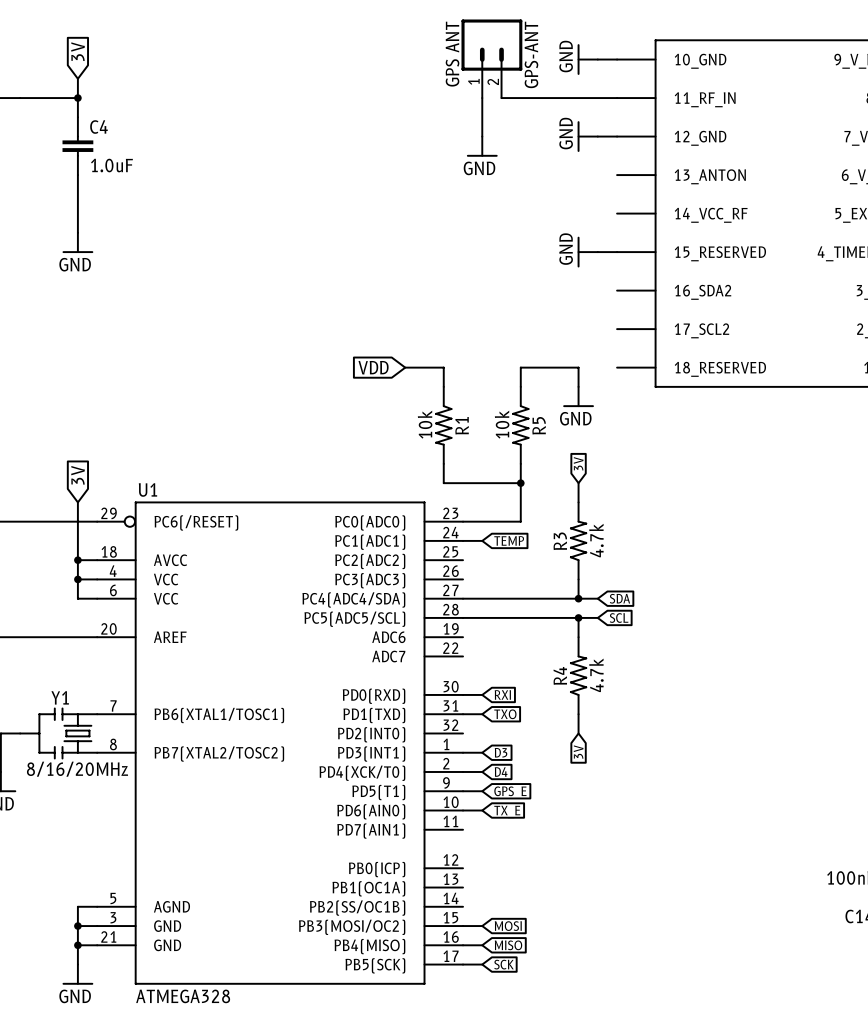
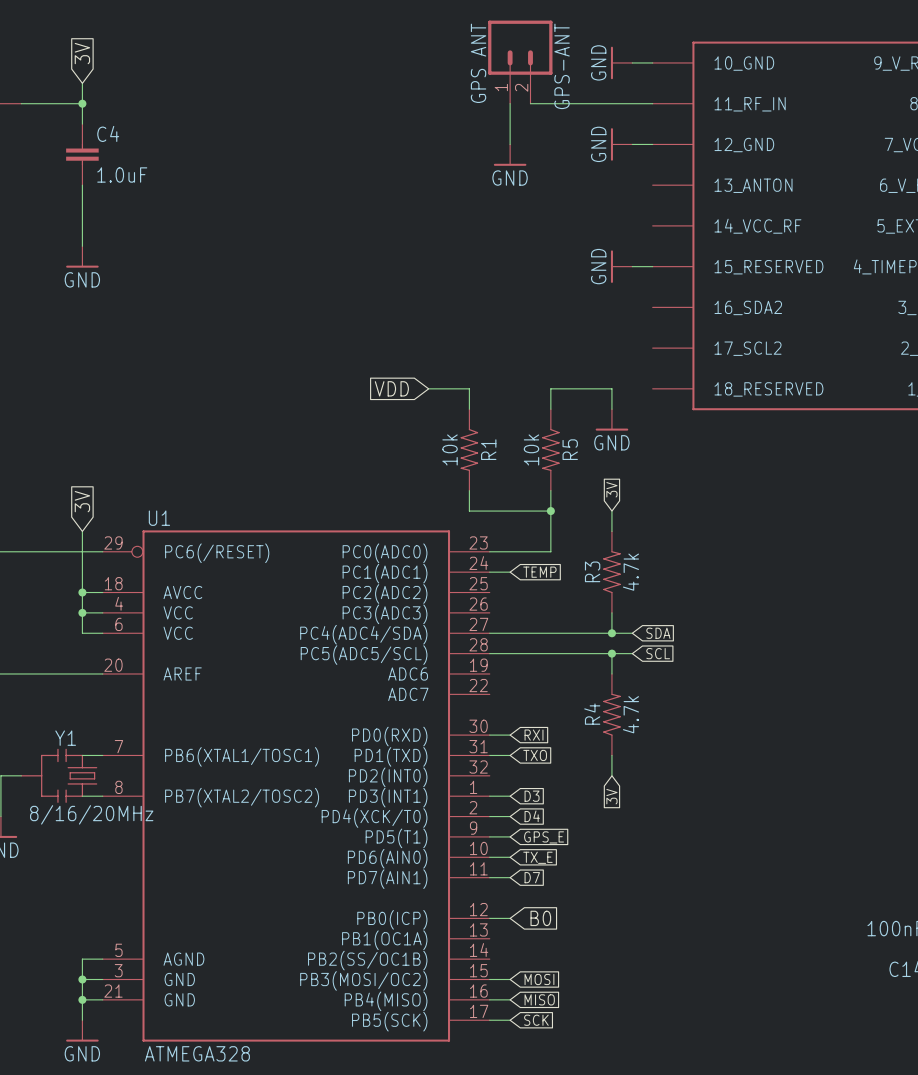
wire: none -> (489, 877) (510, 877)
global label: none -> D7 (532, 877)
wire: none -> (489, 918) (510, 918)
global label: none -> B0 (540, 918)

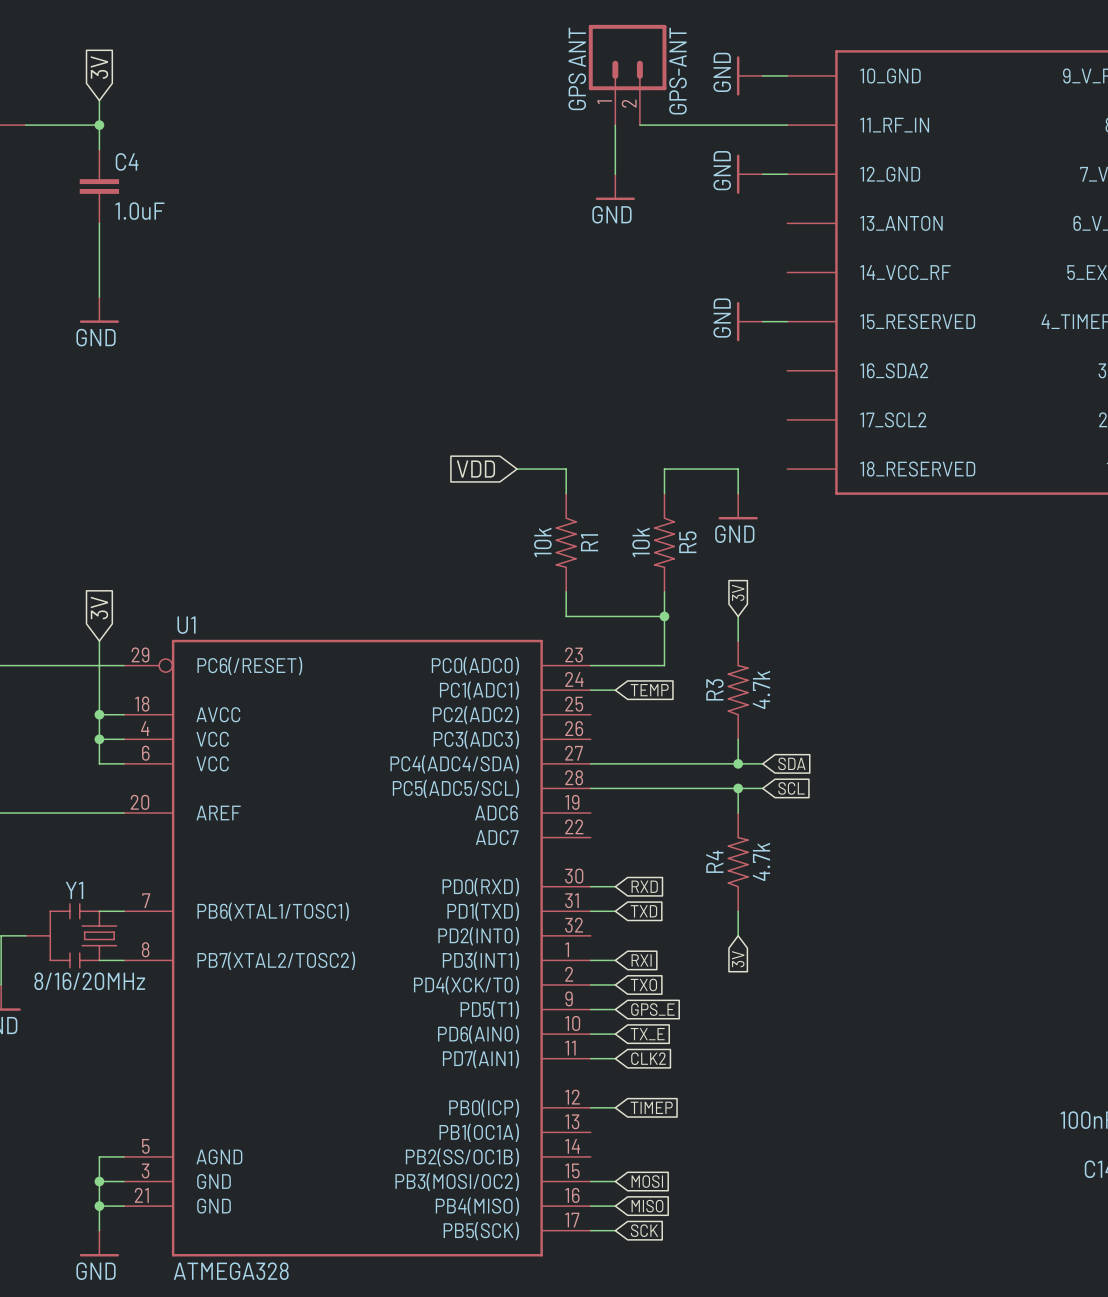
global label: RXI (534, 735) -> RXD (644, 886)
global label: TXO (535, 755) -> TXD (643, 911)
global label: D3 (532, 796) -> RXI (641, 960)
global label: D4 (532, 816) -> TXO (643, 984)
global label: D7 (532, 877) -> CLK2 (648, 1058)
global label: B0 (540, 918) -> TIMEP (651, 1107)

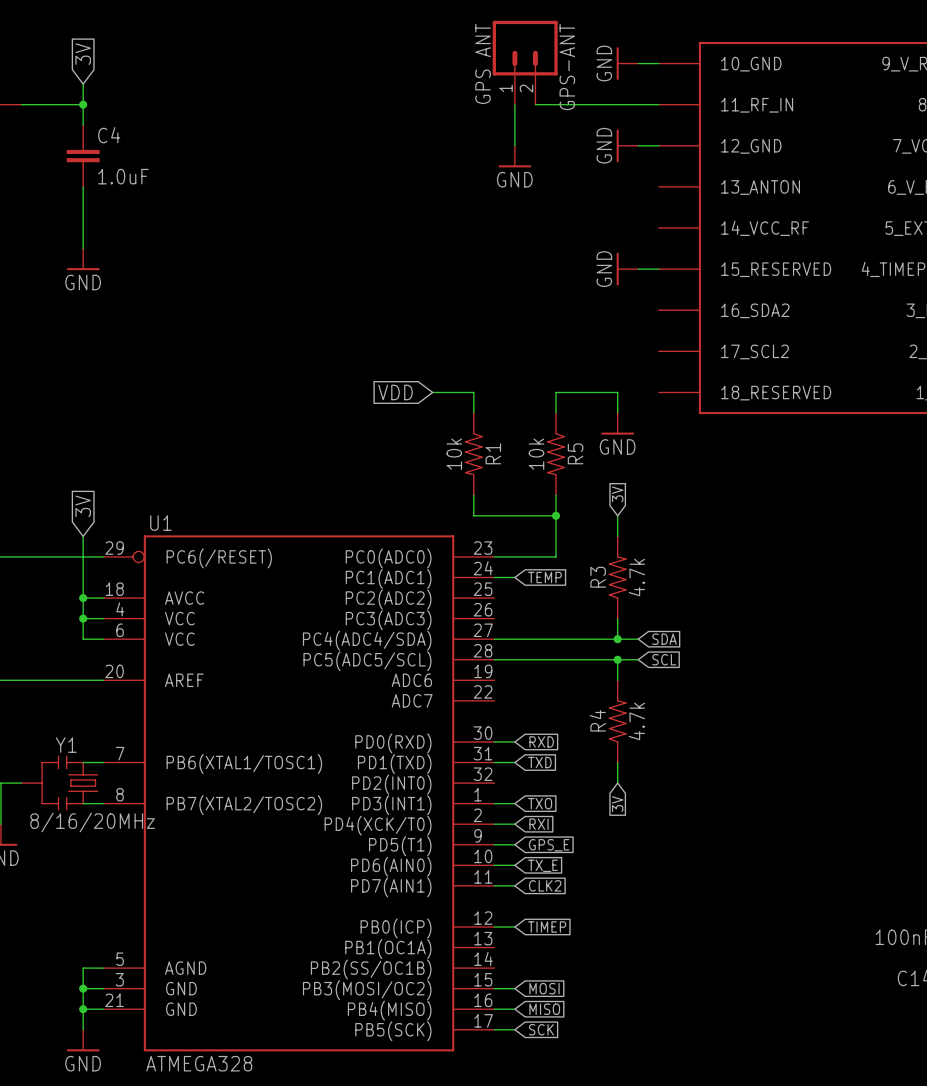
global label: RXI (641, 960) -> TXO (540, 803)
global label: TXO (643, 984) -> RXI (539, 824)

